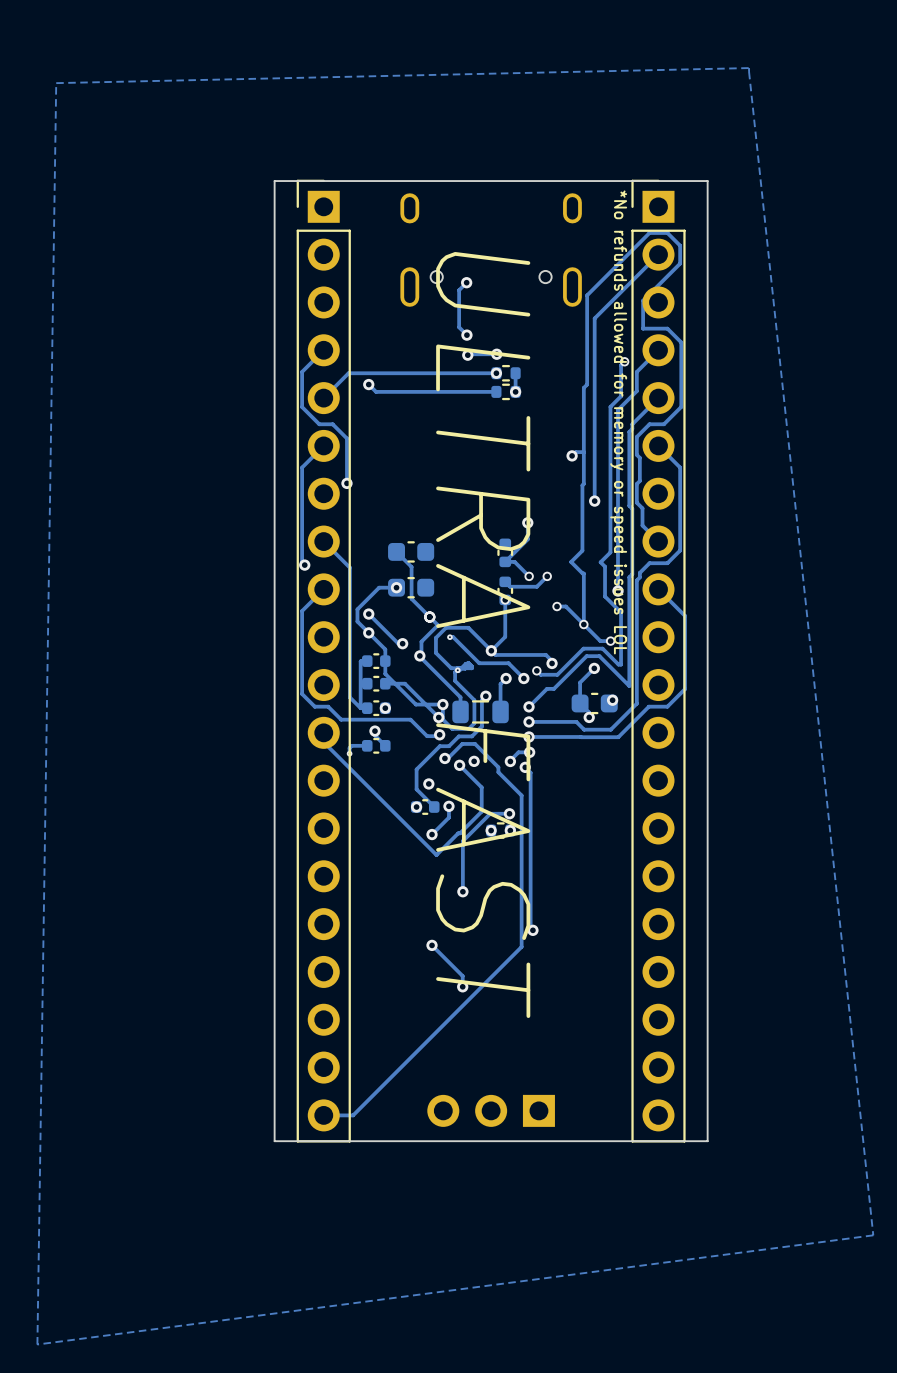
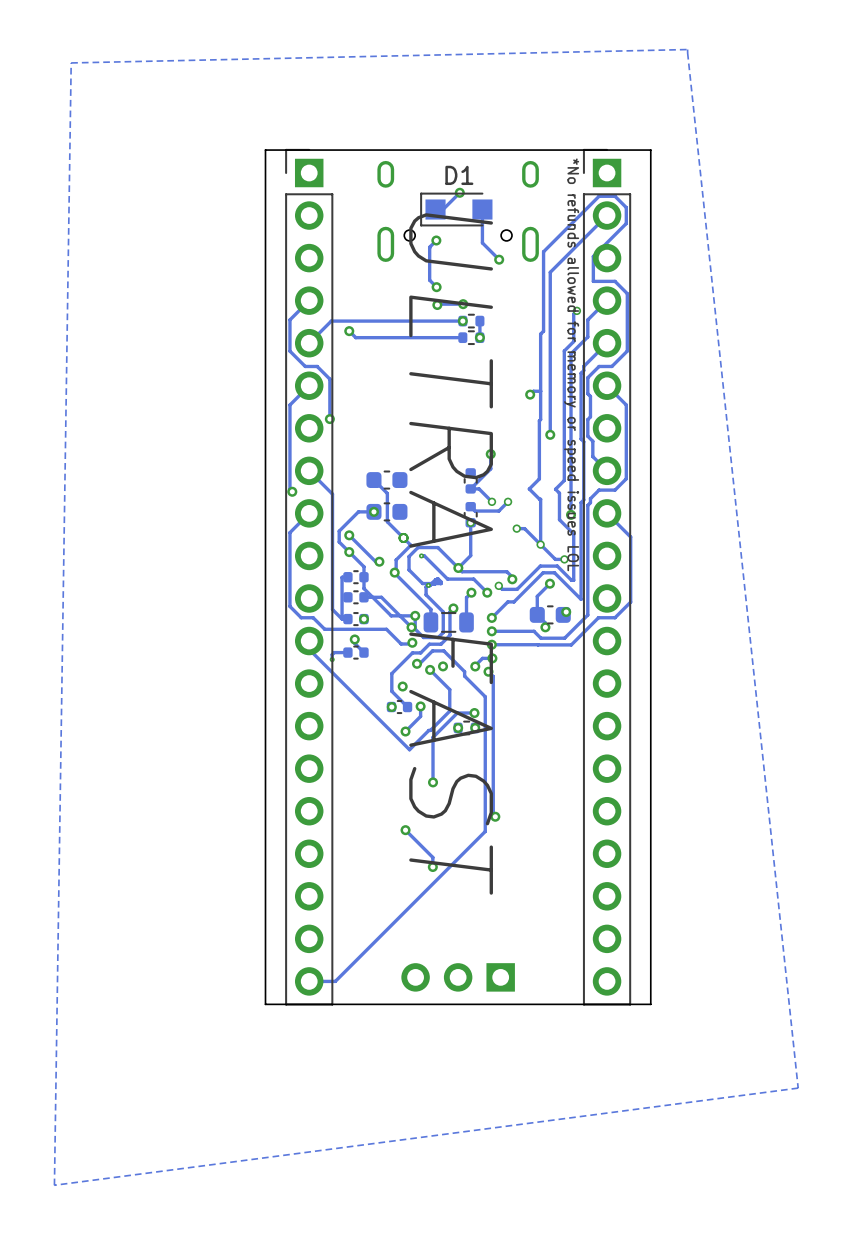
track: none -> (459, 192) (443, 209) (435, 209)
via: none -> (459, 192)
D1: none -> (456, 209)
track: none -> (482, 209) (482, 242) (499, 259)
via: none -> (499, 259)

